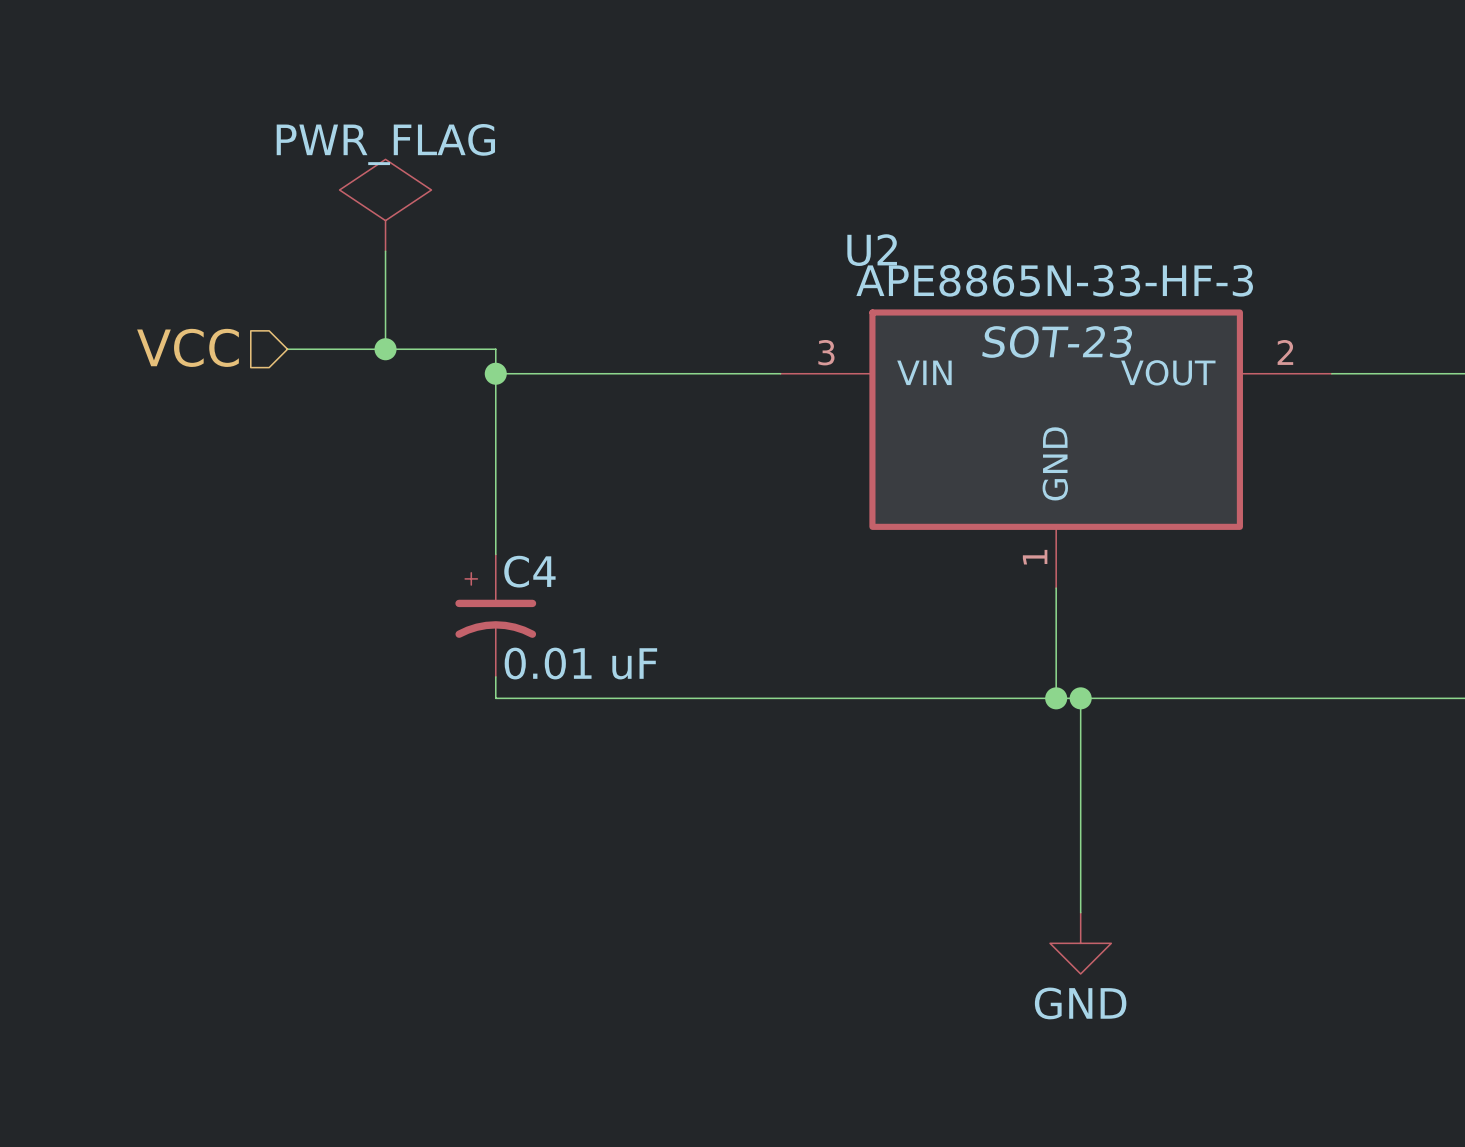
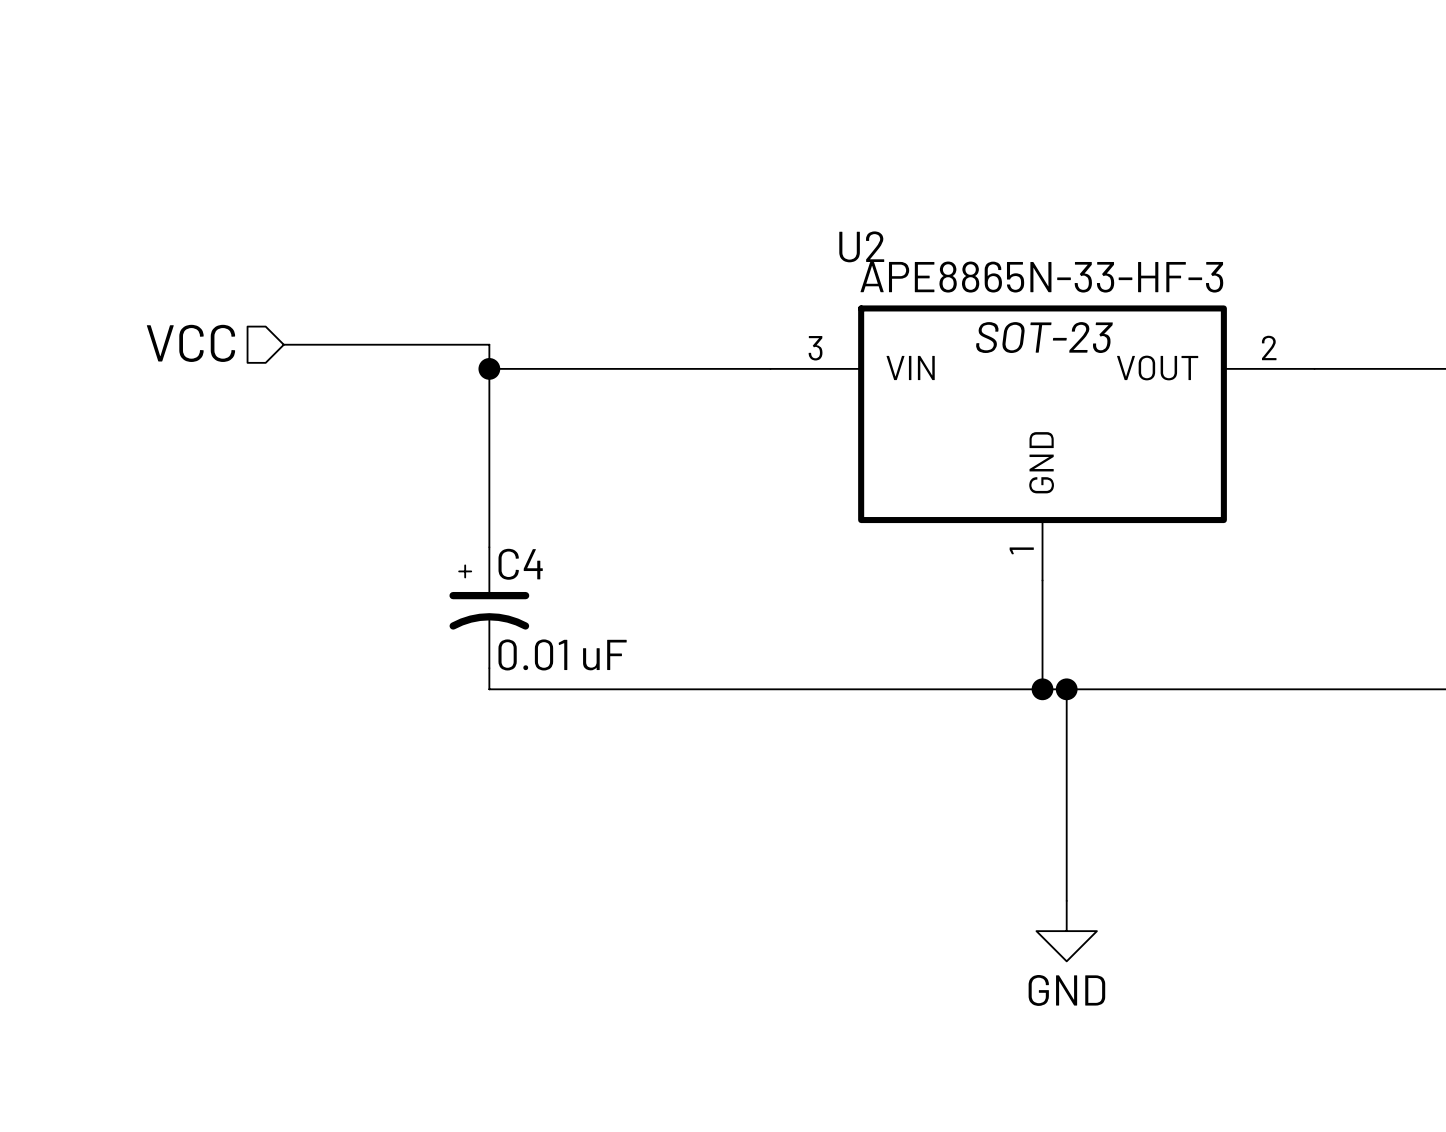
power symbol: PWR_FLAG (385, 205) -> none
wire: (385, 251) (385, 349) -> none
junction: (385, 349) -> none

